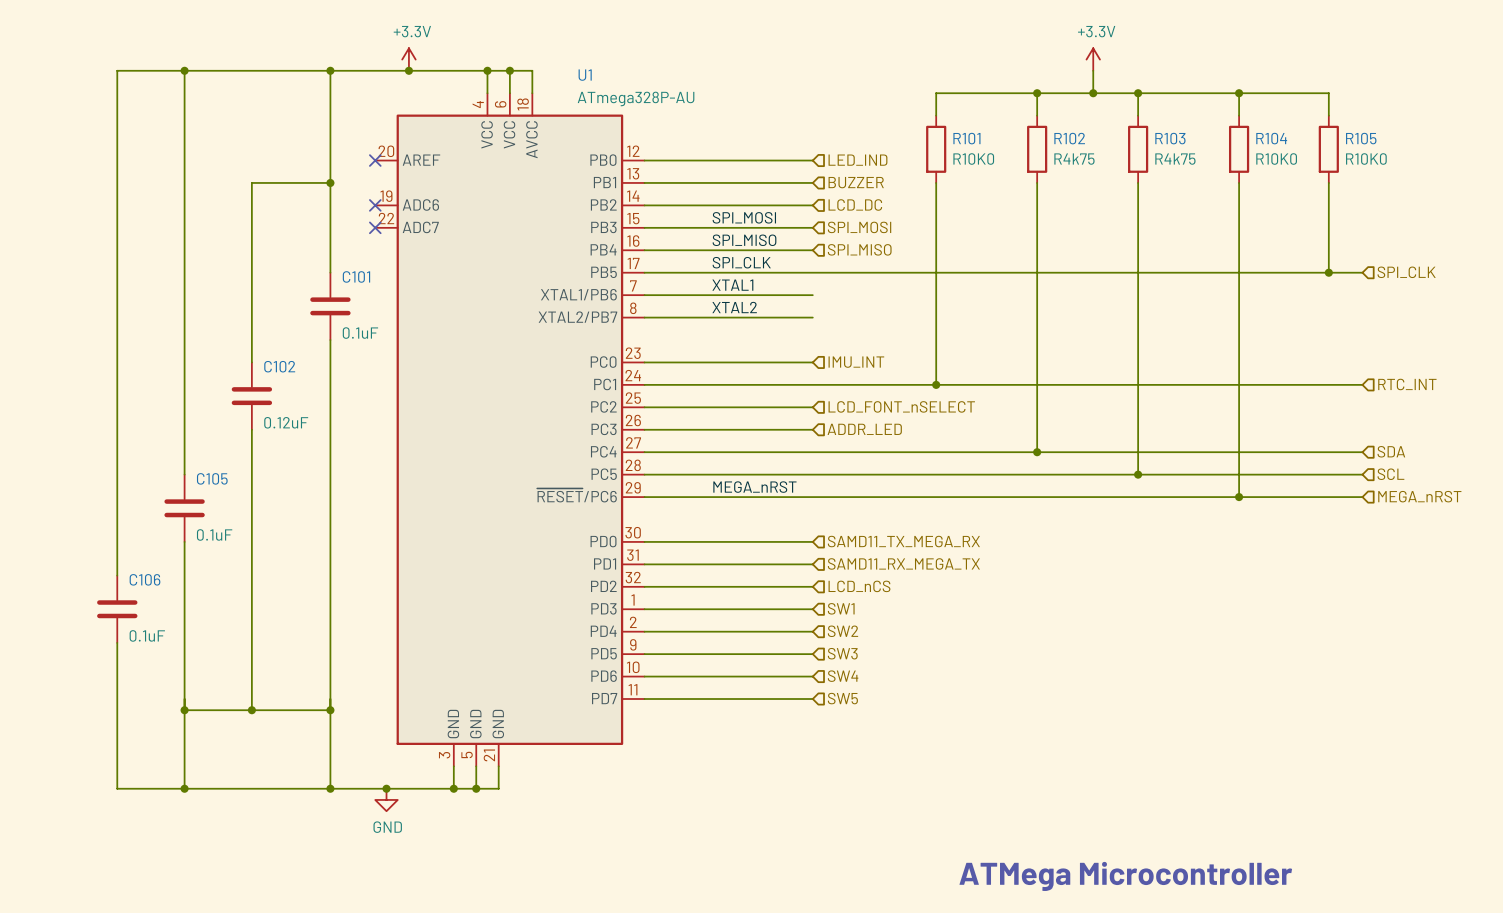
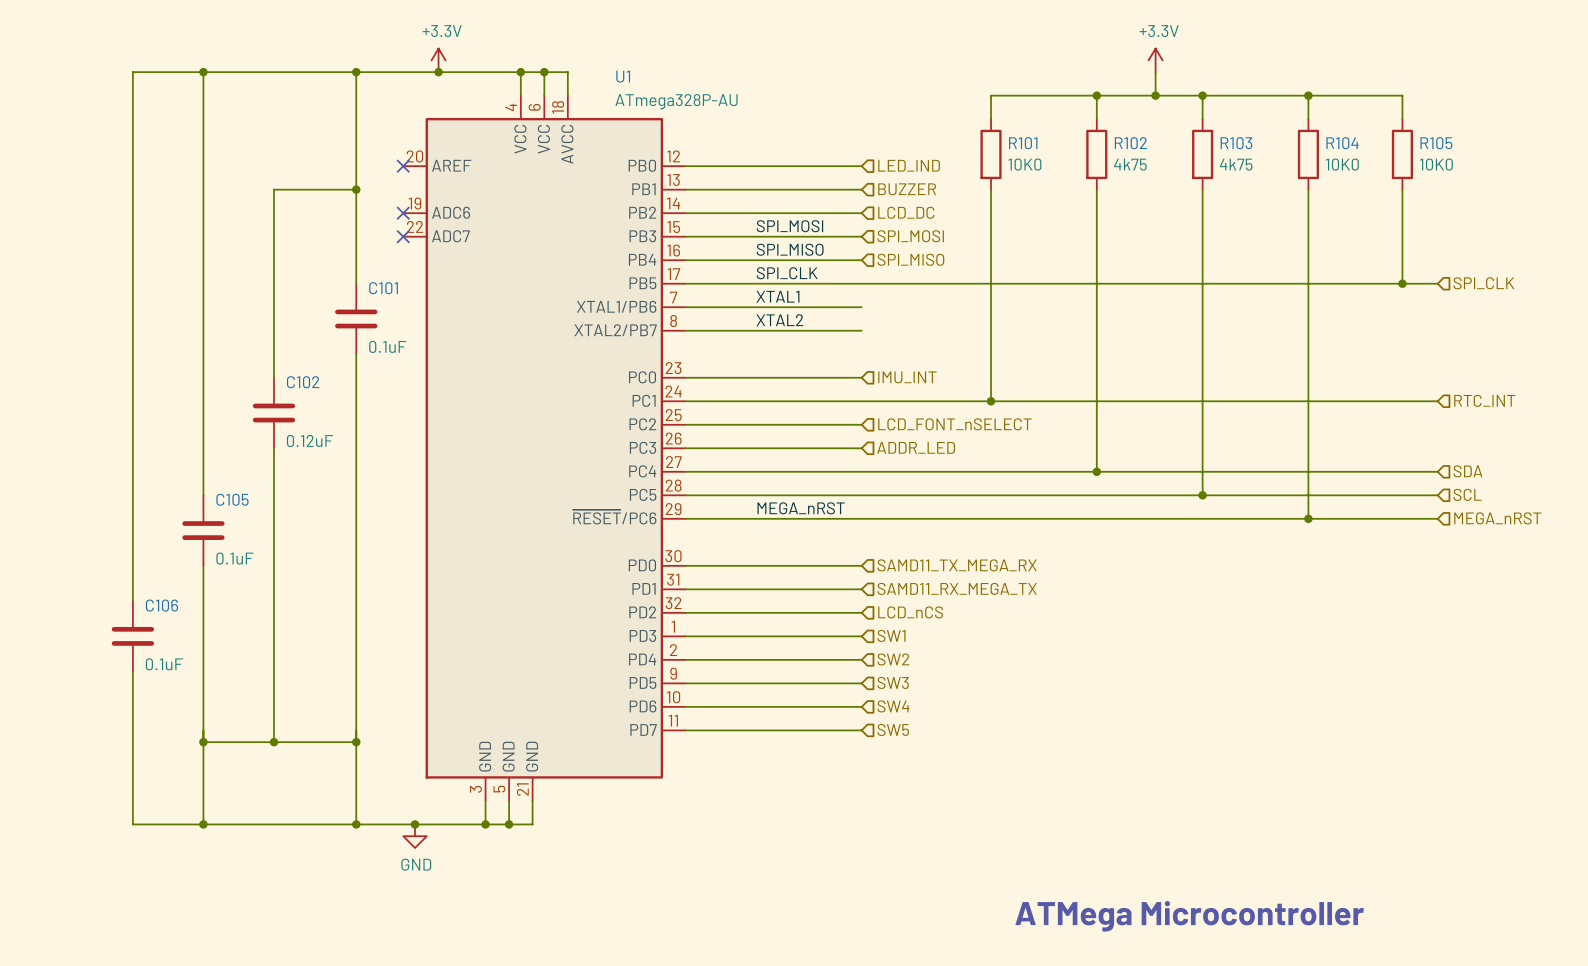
R101 value: R10K0 (973, 159) -> 10K0 (1024, 164)
R102 value: R4k75 (1074, 159) -> 4k75 (1130, 164)
R103 value: R4k75 (1175, 159) -> 4k75 (1236, 164)
R104 value: R10K0 (1276, 159) -> 10K0 (1342, 164)
R105 value: R10K0 (1366, 159) -> 10K0 (1436, 164)

